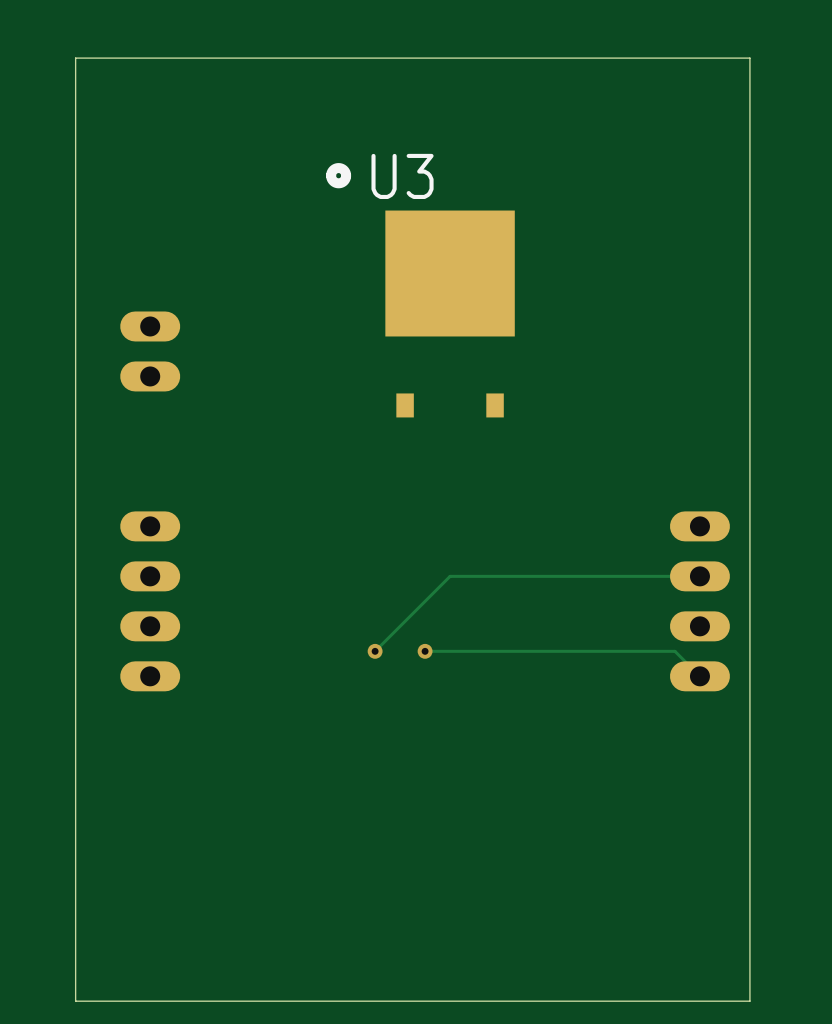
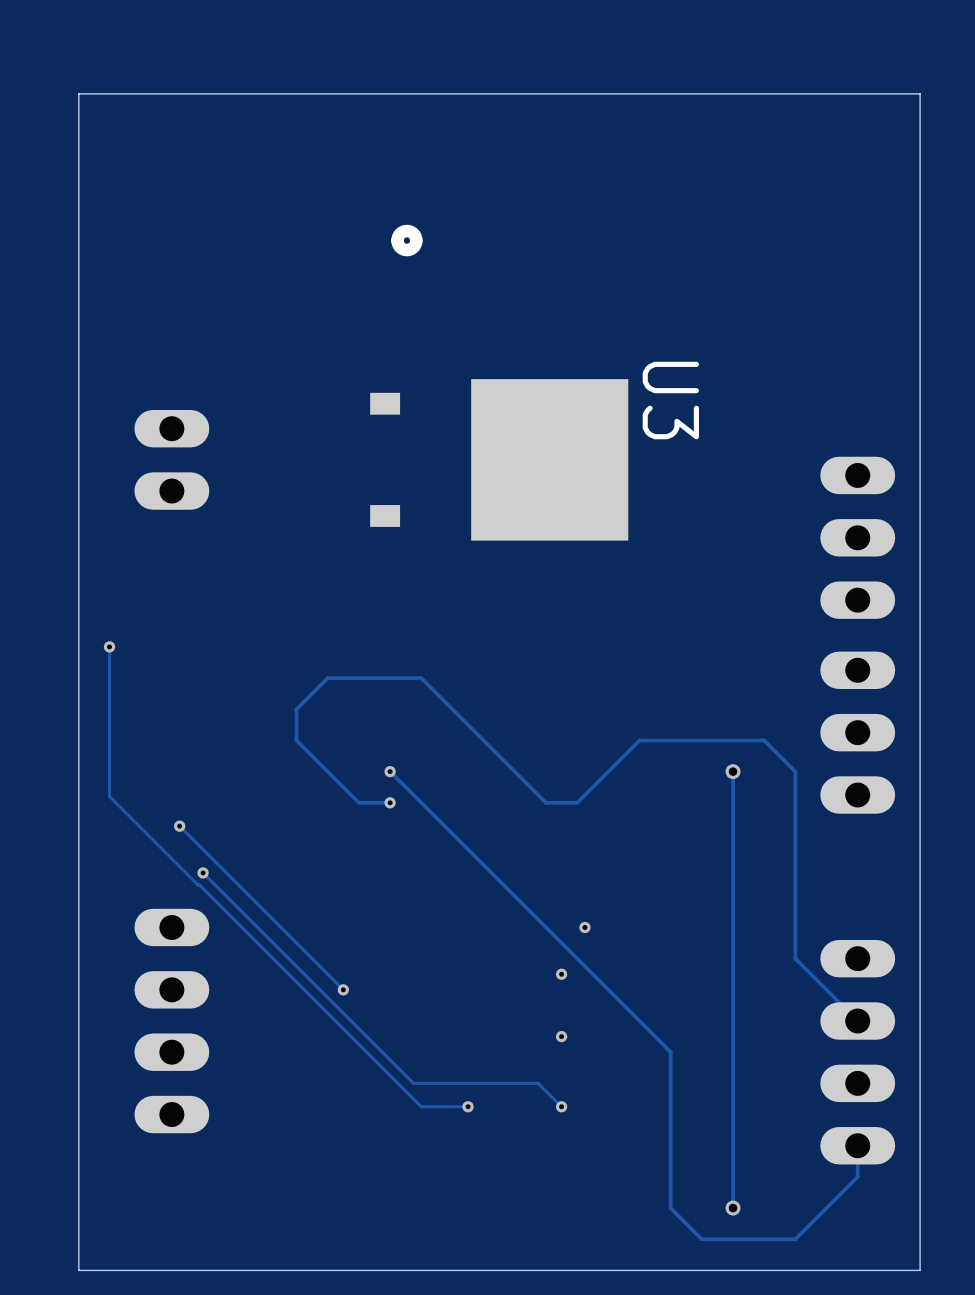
U3 rotation: 0° (450, 313) -> 90° clockwise (499, 459)
part: none -> (857, 537)
track: none -> (109, 646) (109, 796) (421, 1106) (468, 1106)
via: none -> (109, 646)
part: none -> (857, 732)
track: (525, 576) (450, 576) (375, 651) -> (639, 740) (577, 802) (545, 802) (421, 678) (327, 678) (296, 709) (296, 740) (358, 802) (390, 802)
track: (699, 576) (625, 576) -> (857, 1021) (795, 958) (795, 771) (764, 740)
part position: (150, 601) -> (171, 1021)
track: none -> (390, 771) (670, 1052) (670, 1208) (701, 1239) (795, 1239) (857, 1176) (857, 1145)
via: none -> (390, 771)
track: none -> (733, 771) (733, 1208)
via: none -> (733, 771)
part position: (699, 601) -> (857, 1052)
via: none -> (390, 802)
track: none -> (179, 826) (343, 989)
via: none -> (179, 826)
via: (375, 651) -> none
track: (425, 651) (674, 651) (699, 676) -> none
via: (425, 651) -> none
track: none -> (203, 872) (413, 1083) (538, 1083) (561, 1106)
via: none -> (203, 872)
via: none -> (584, 927)
via: none -> (561, 974)
via: none -> (343, 989)
via: none -> (561, 1036)
via: none -> (468, 1106)
via: none -> (561, 1106)
via: none -> (733, 1208)

